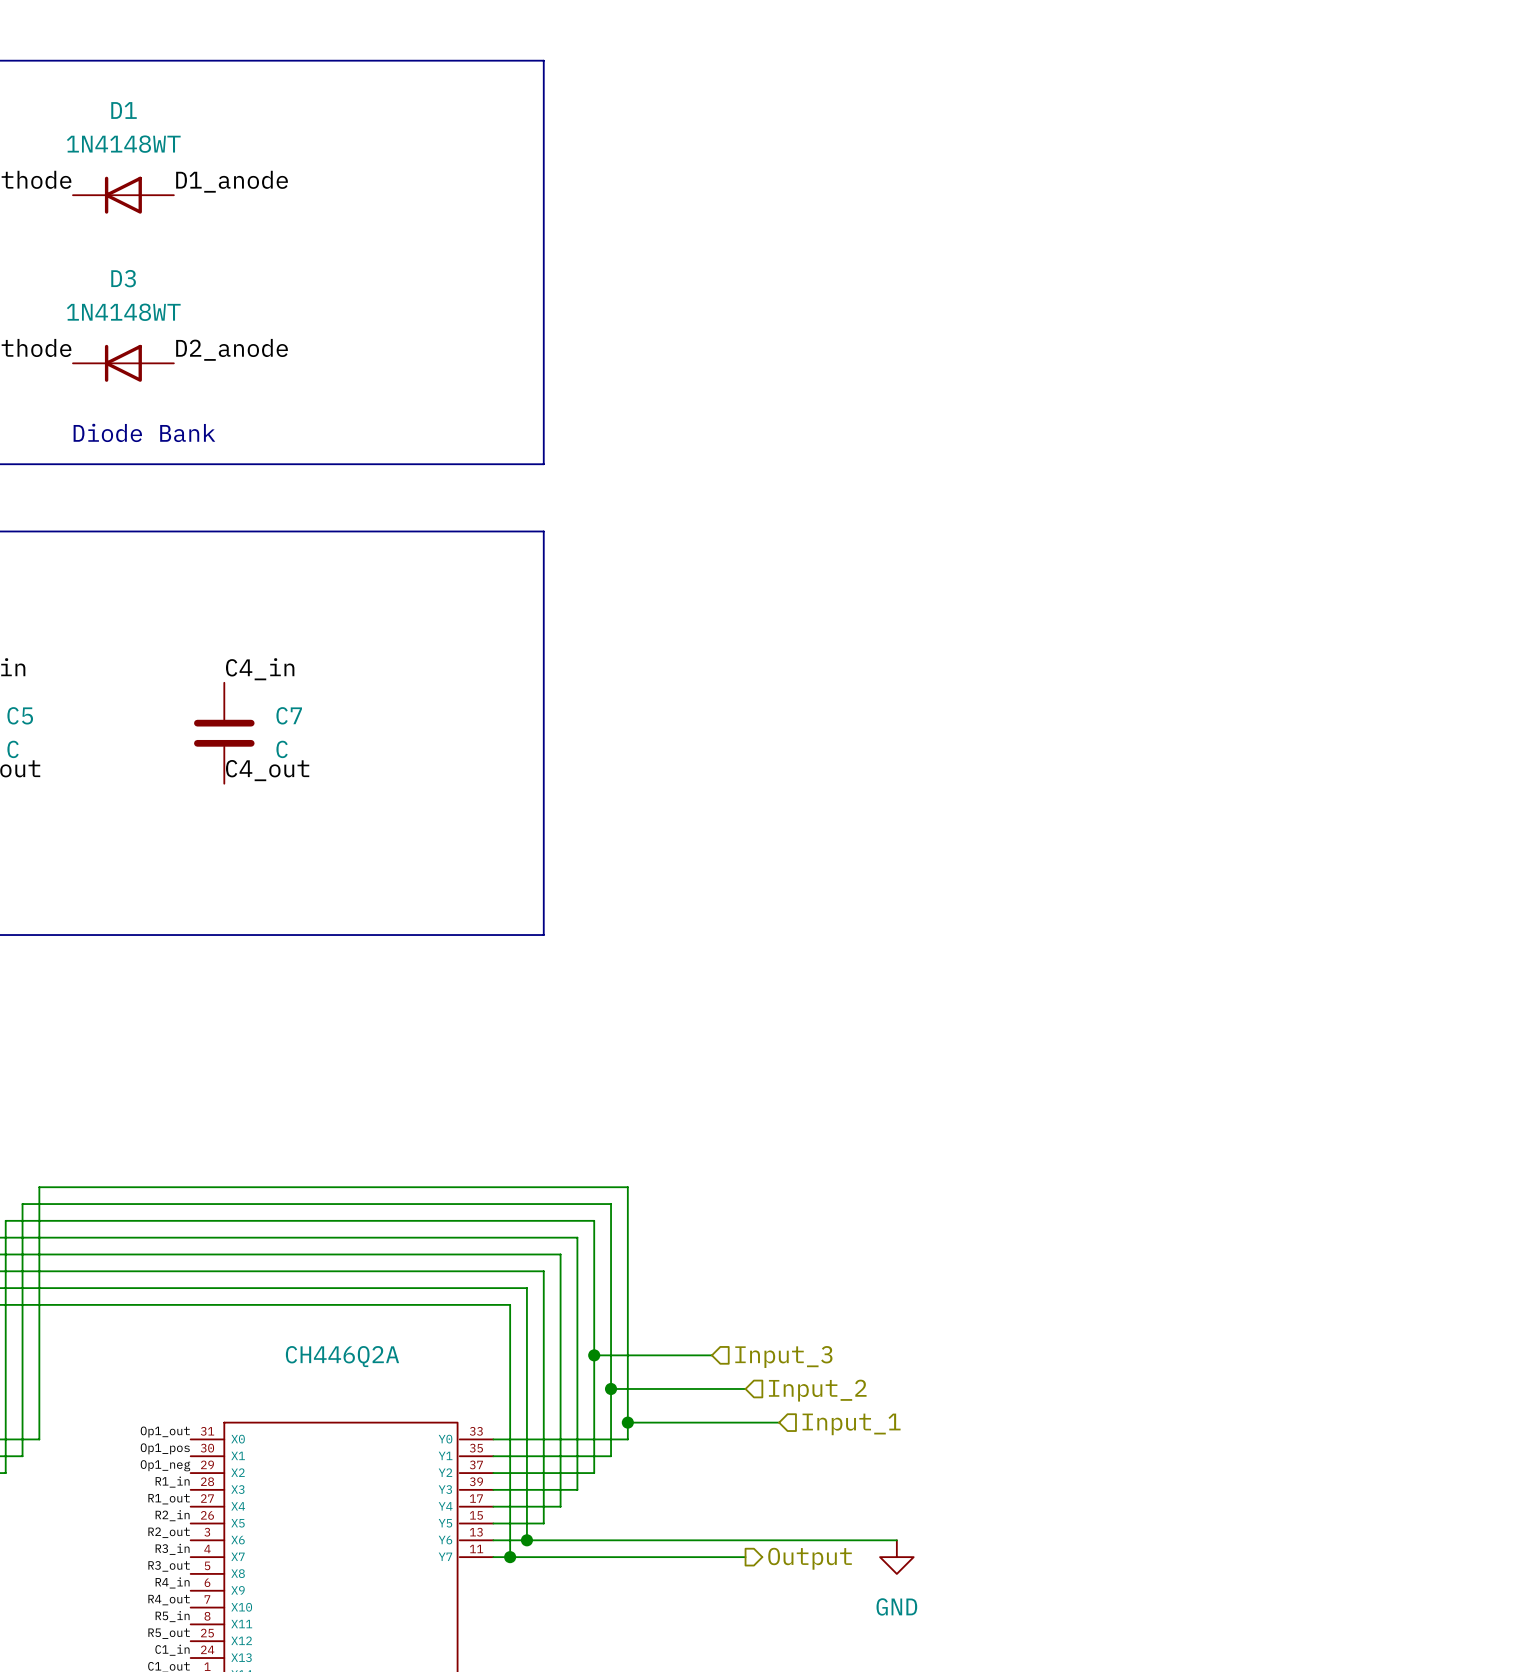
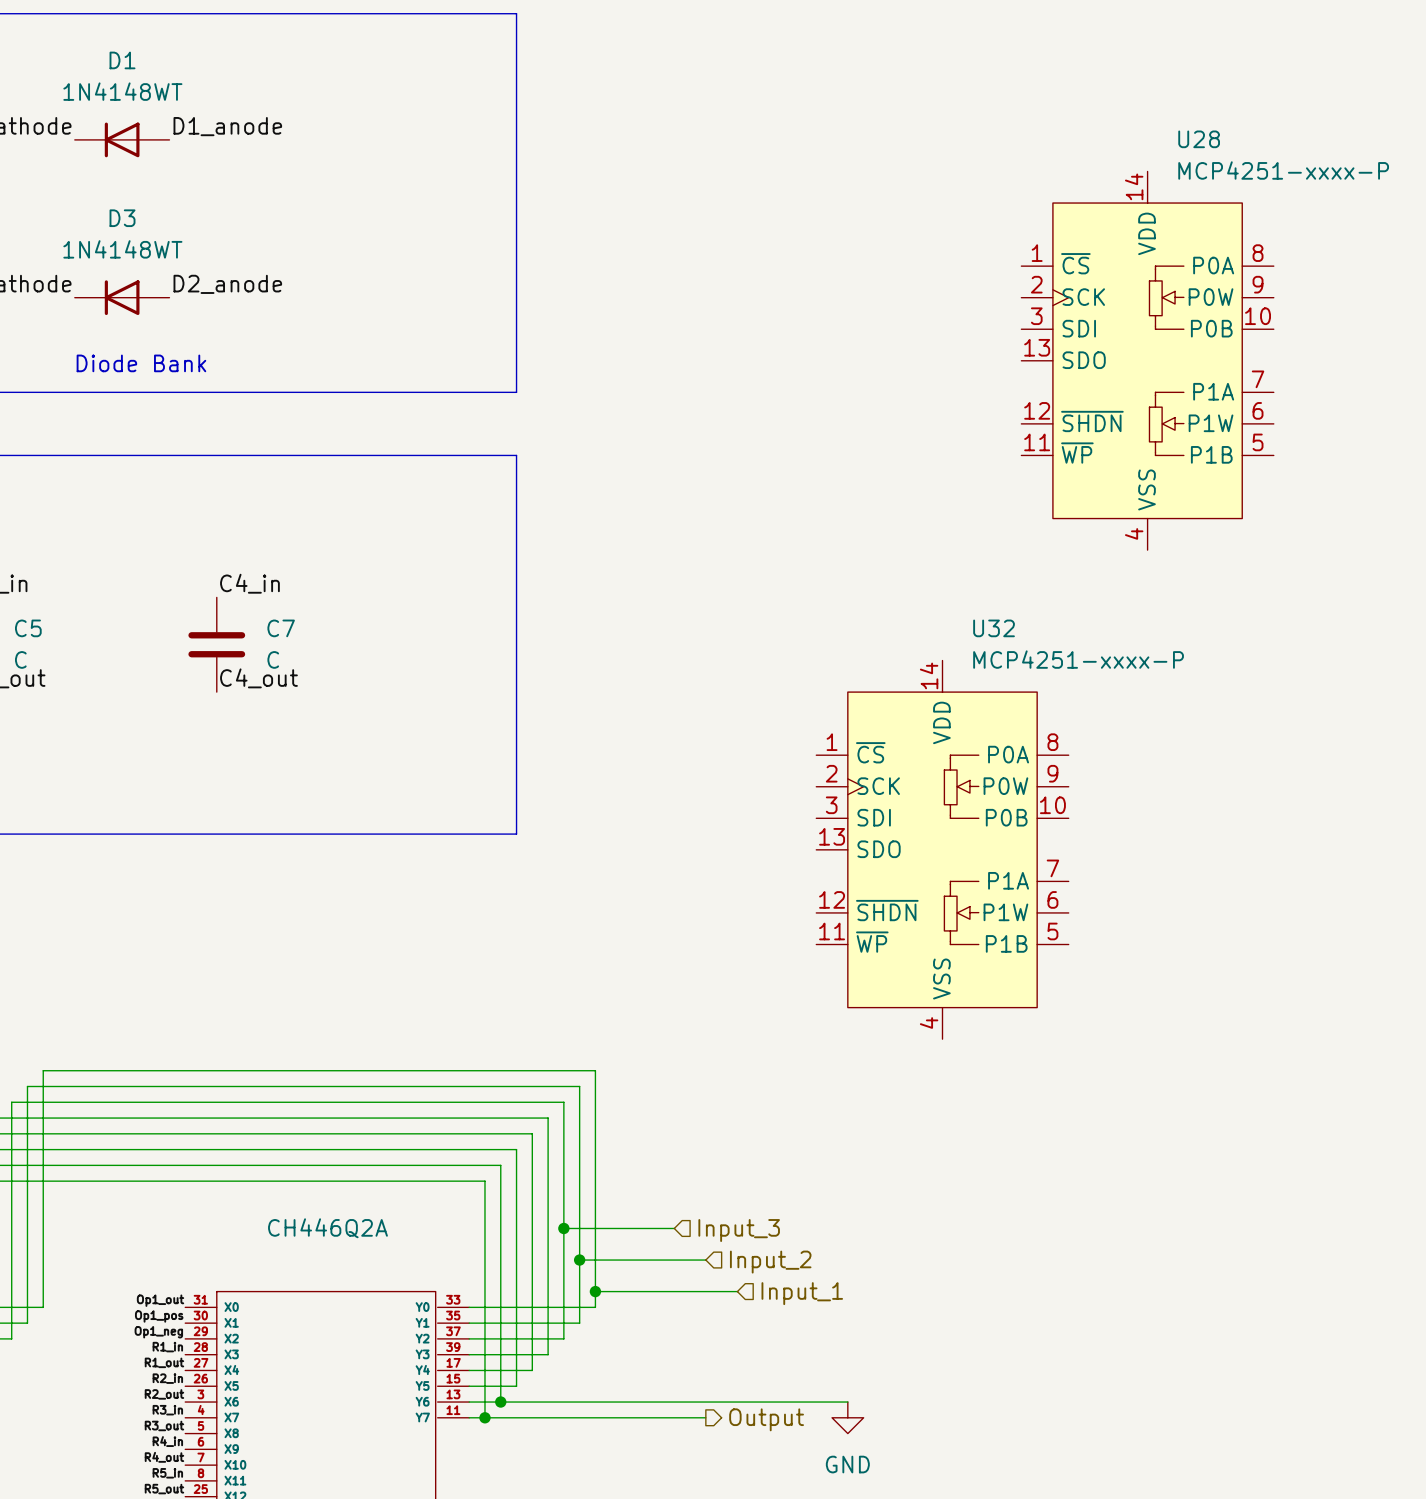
U28: none -> MCP4251-xxxx-P (1147, 360)
U32: none -> MCP4251-xxxx-P (942, 849)

